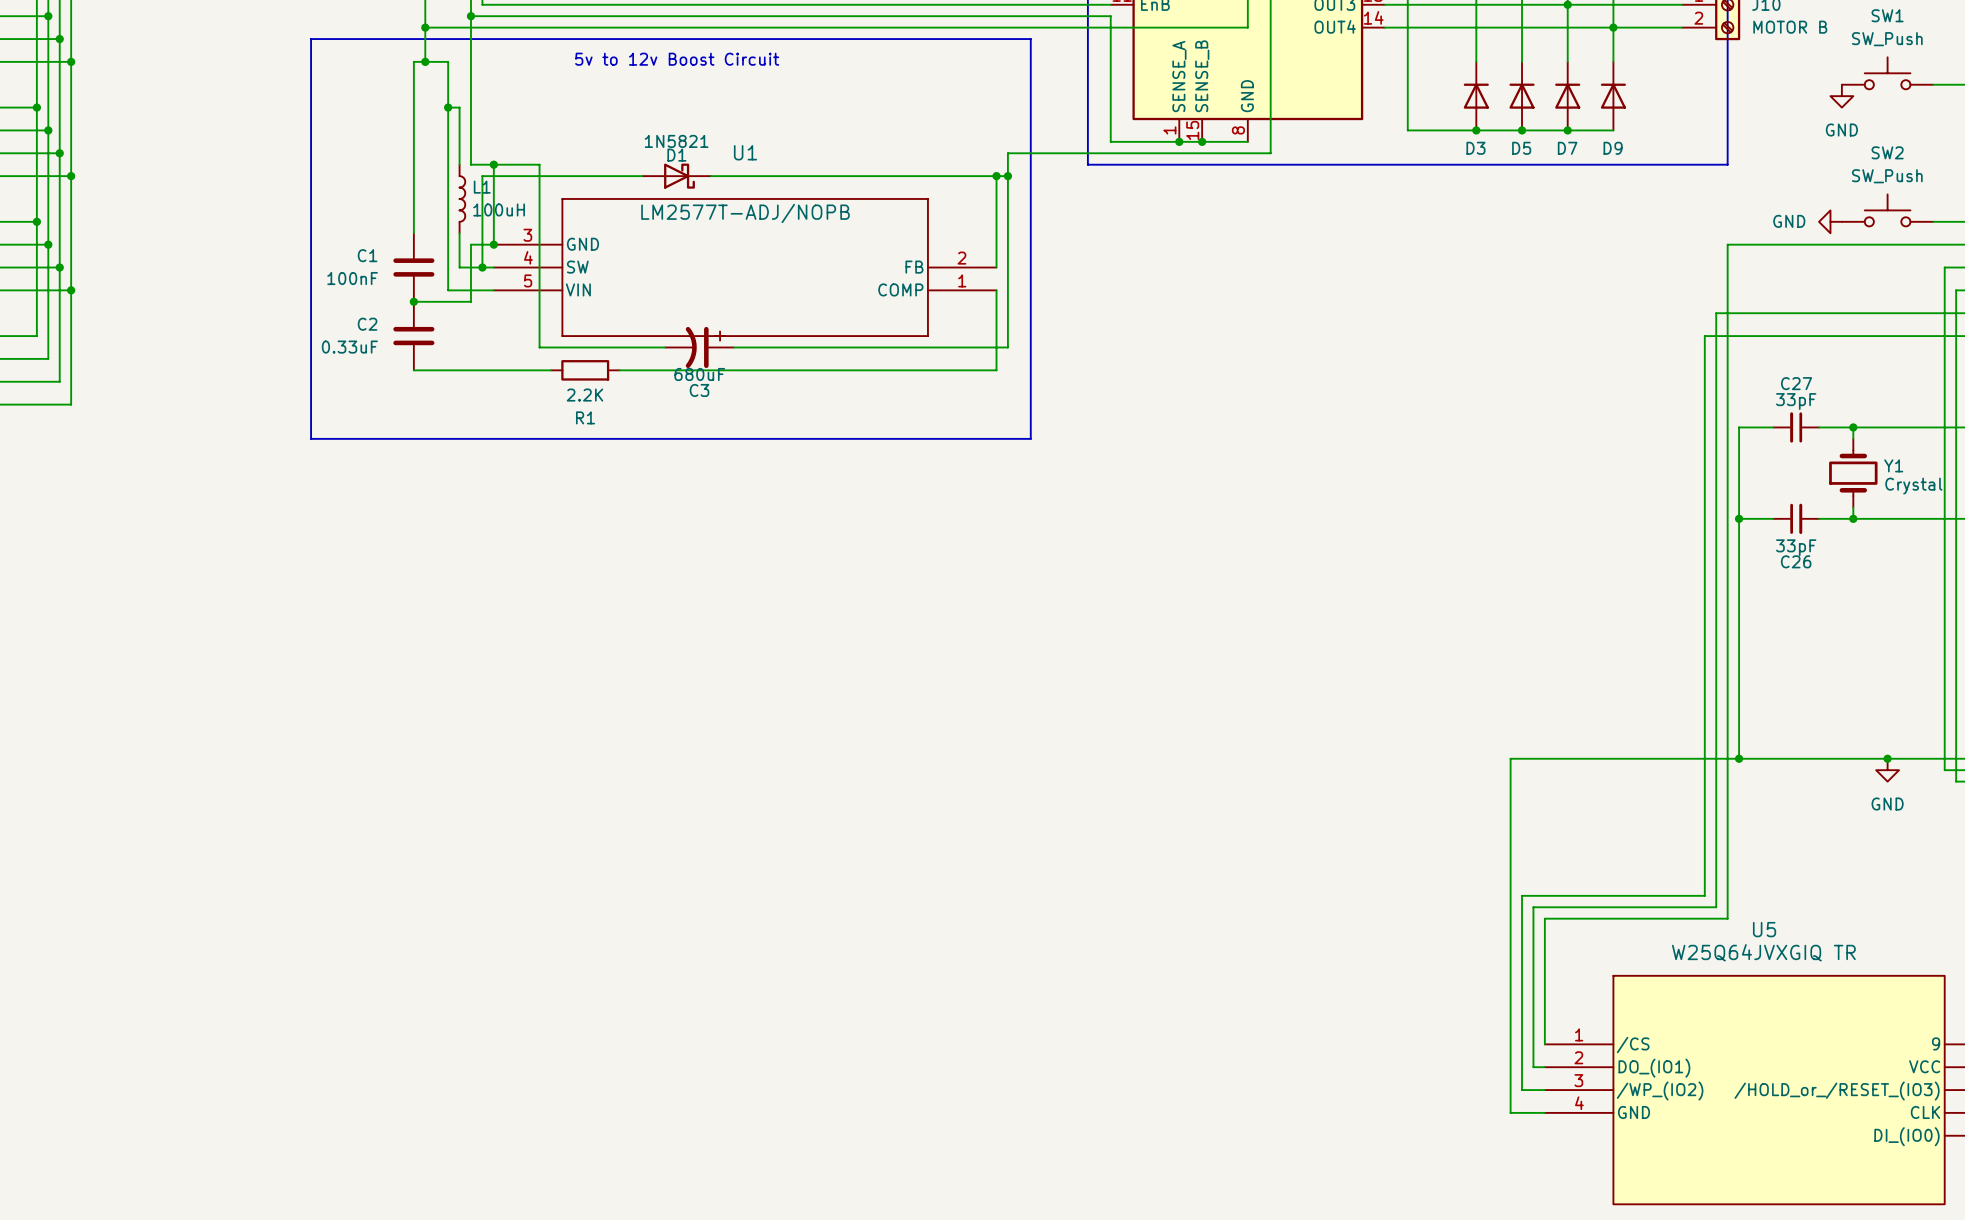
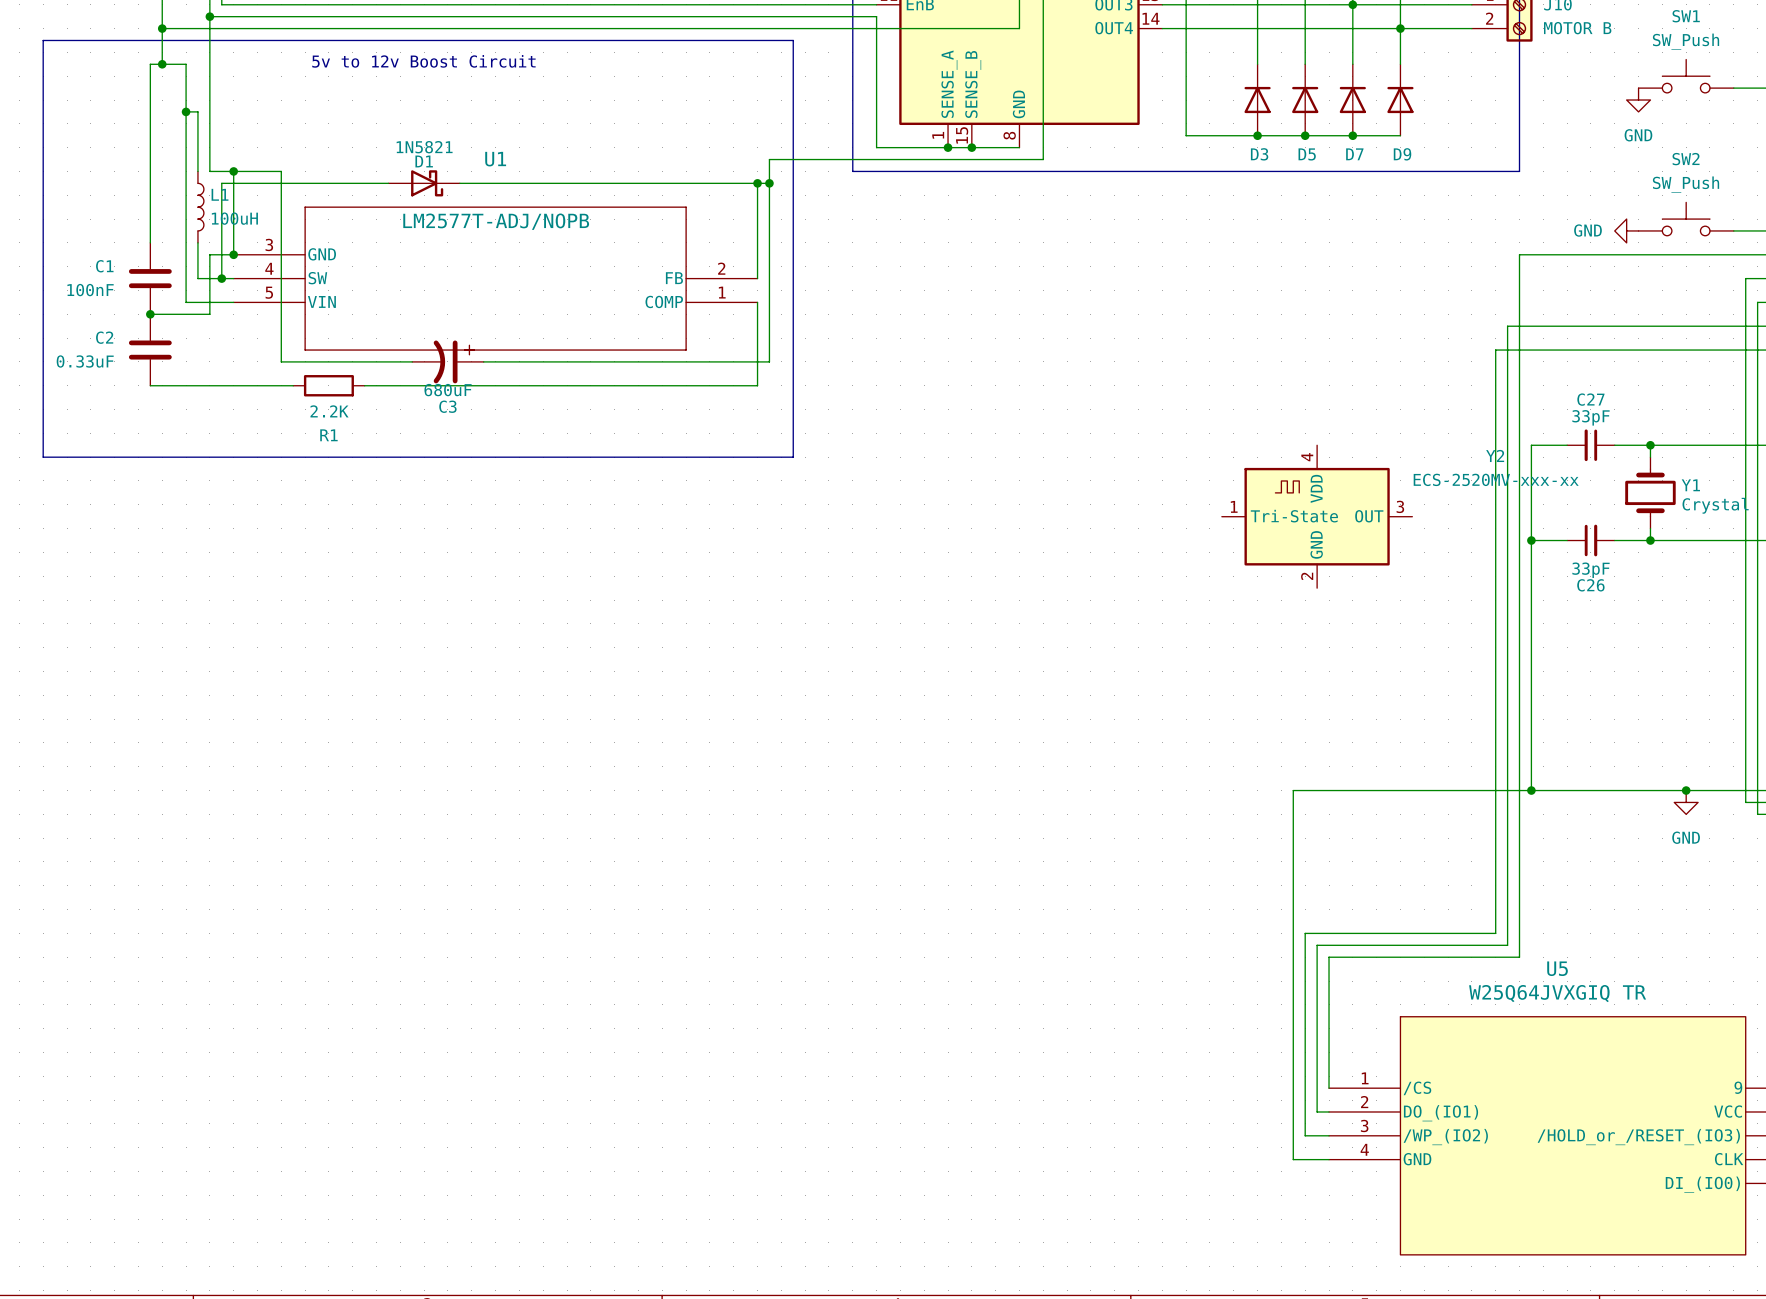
Y2: none -> ECS-2520MV-xxx-xx (1317, 516)

